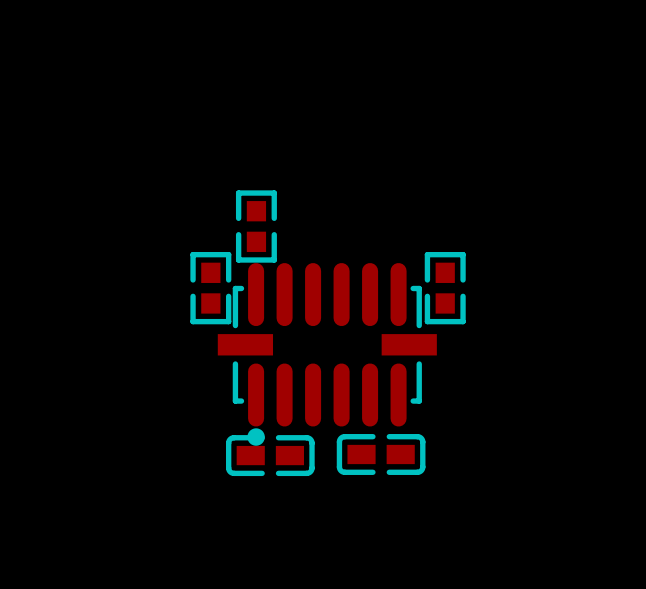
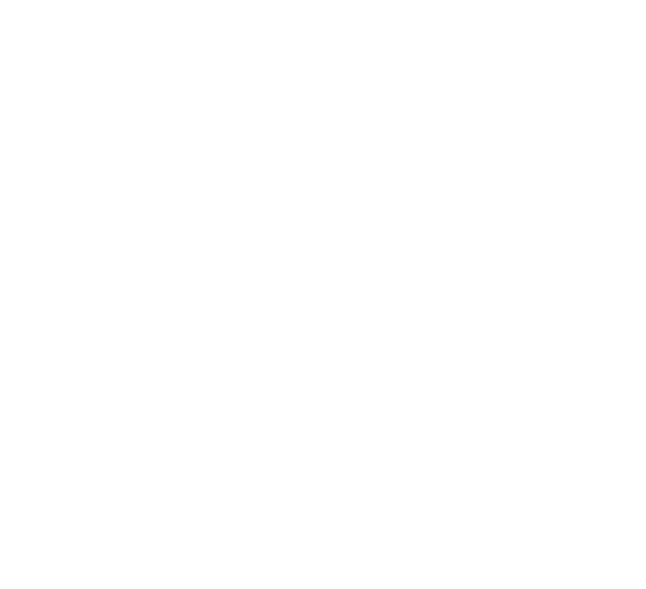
part: (256, 226) -> none
part: (210, 288) -> none
part: (445, 288) -> none
part: (327, 354) -> none
part: (381, 454) -> none
part: (270, 455) -> none

